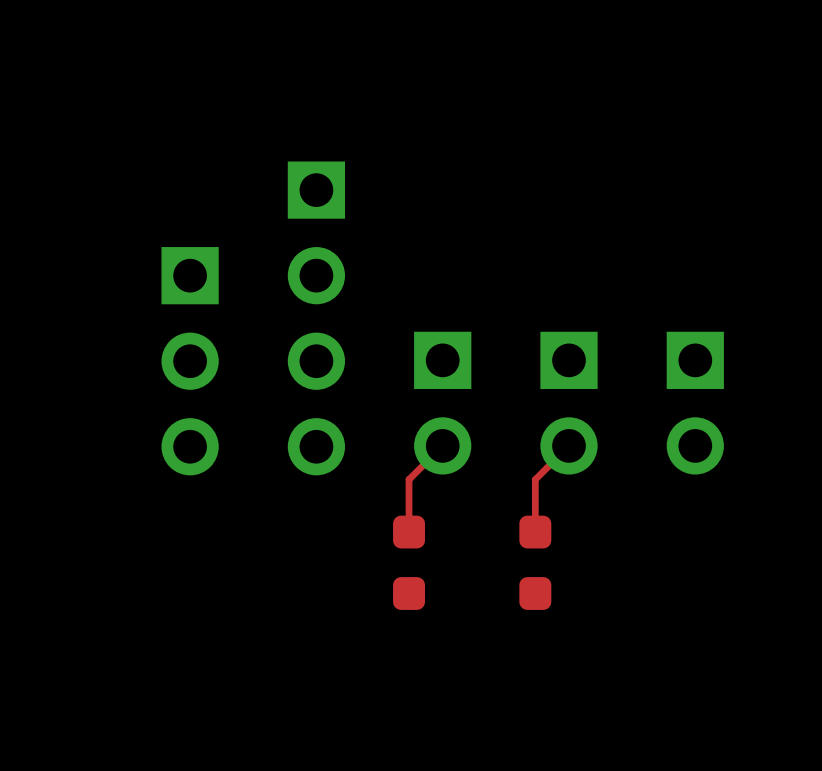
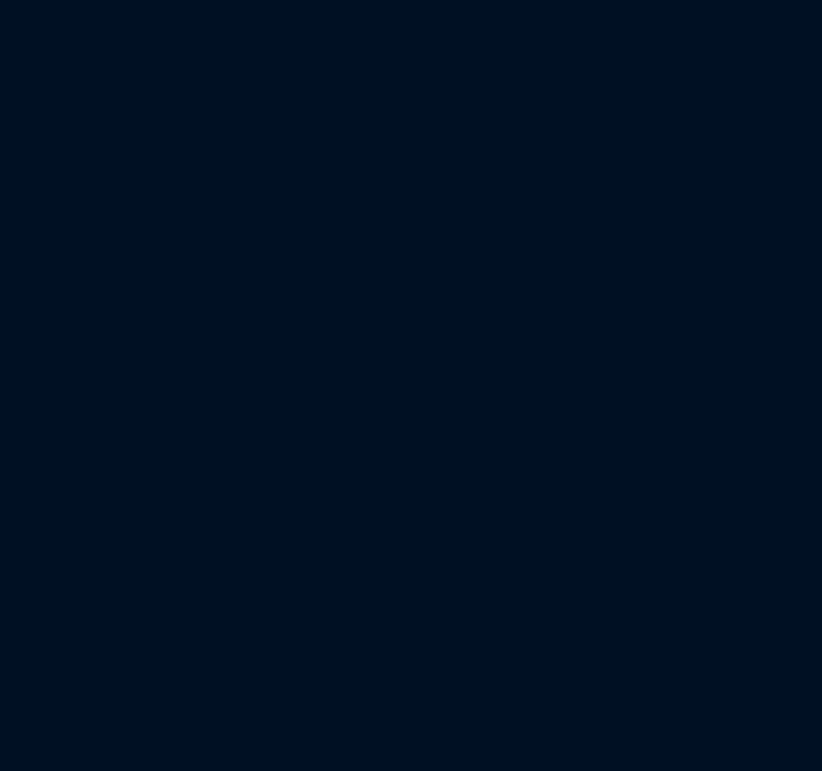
part: (316, 318) -> none
part: (190, 361) -> none
part: (442, 403) -> none
part: (569, 403) -> none
part: (695, 403) -> none
top track: (442, 445) (409, 479) (409, 532) -> none
top track: (569, 445) (535, 479) (535, 532) -> none
part: (409, 562) -> none
part: (535, 562) -> none

